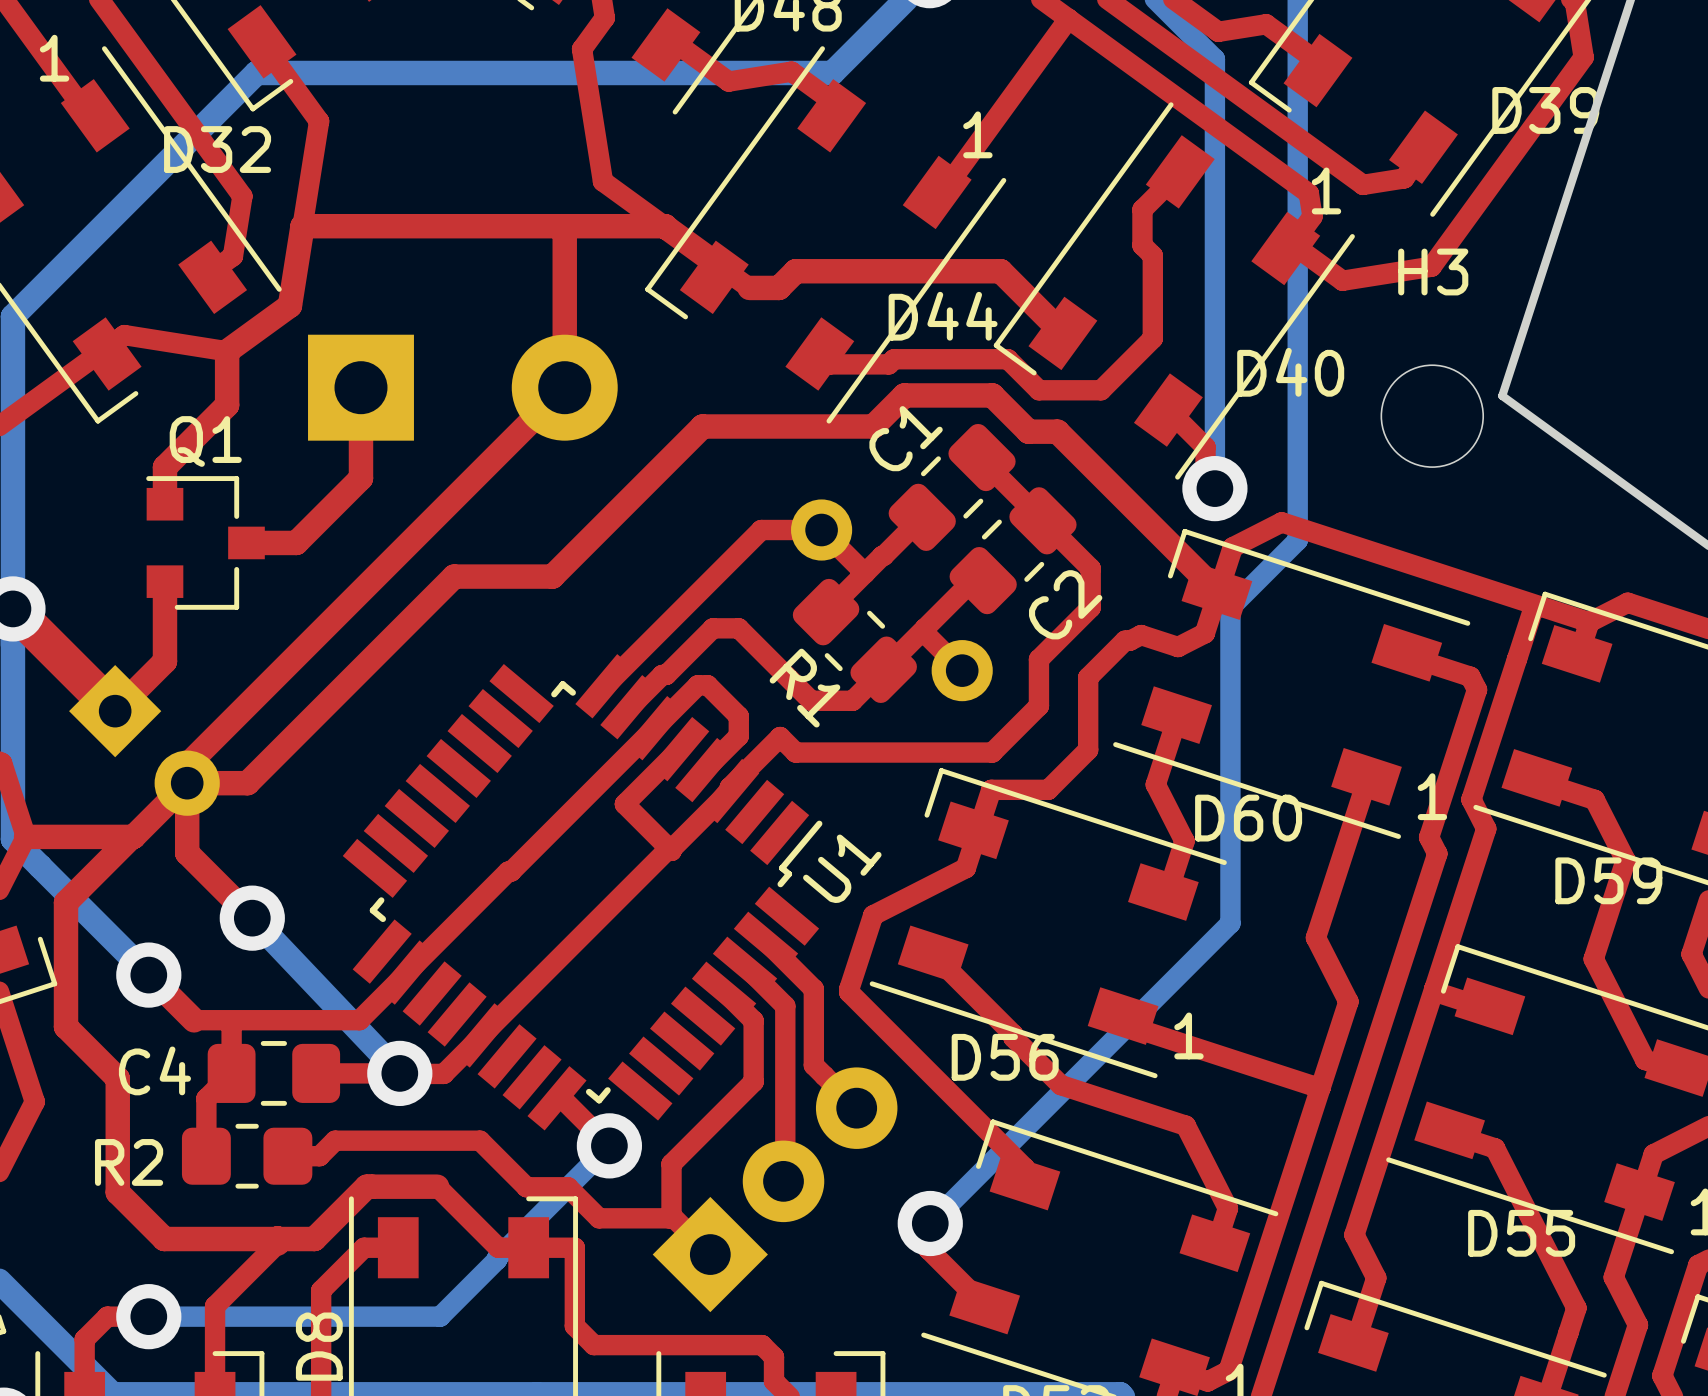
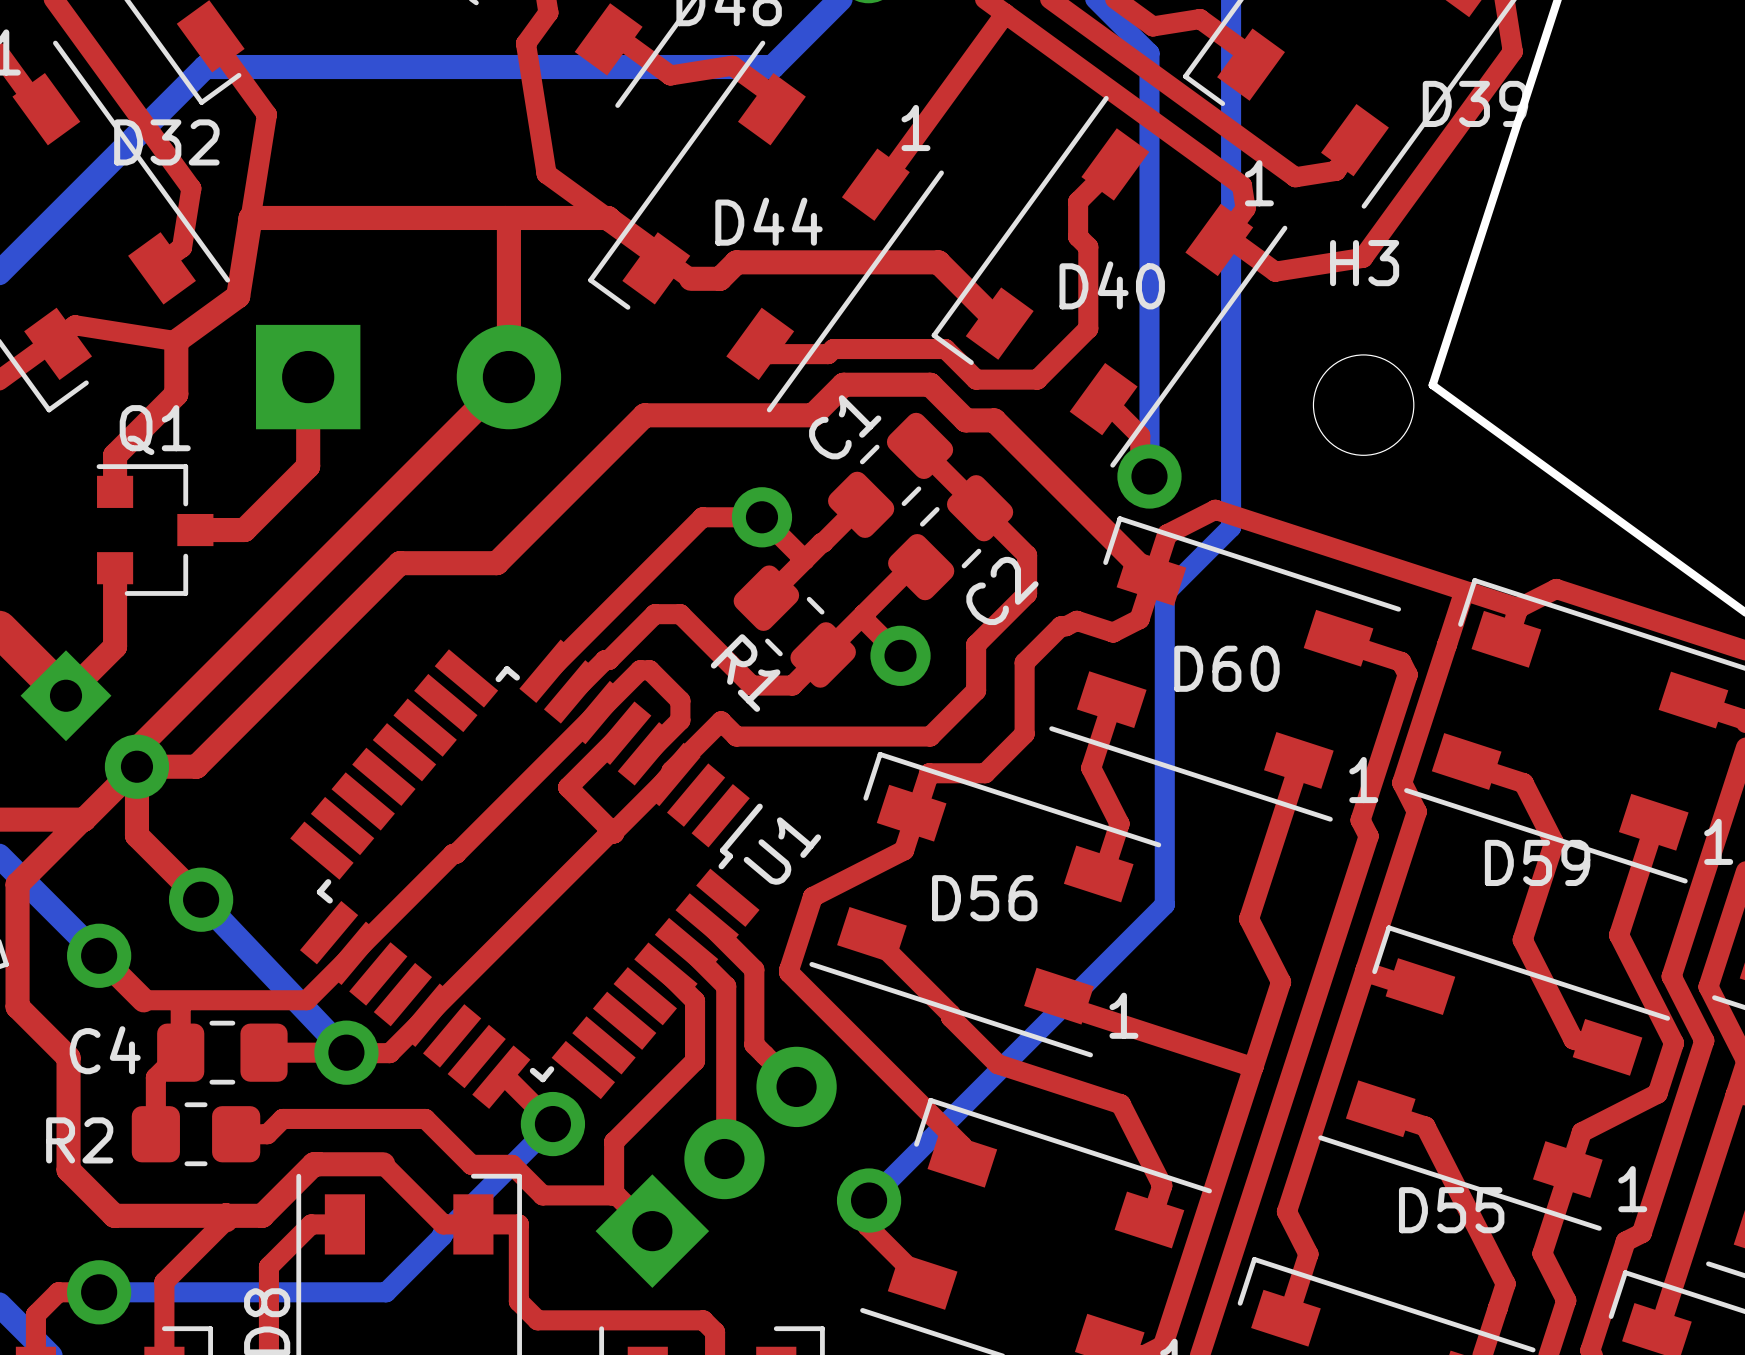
D44 name position: D44 (943, 316) -> D44 (768, 221)
D40 name position: D40 (1290, 372) -> D40 (1112, 285)
D60 name position: D60 (1248, 818) -> D60 (1226, 668)
D56 name position: D56 (1005, 1057) -> D56 (984, 898)

